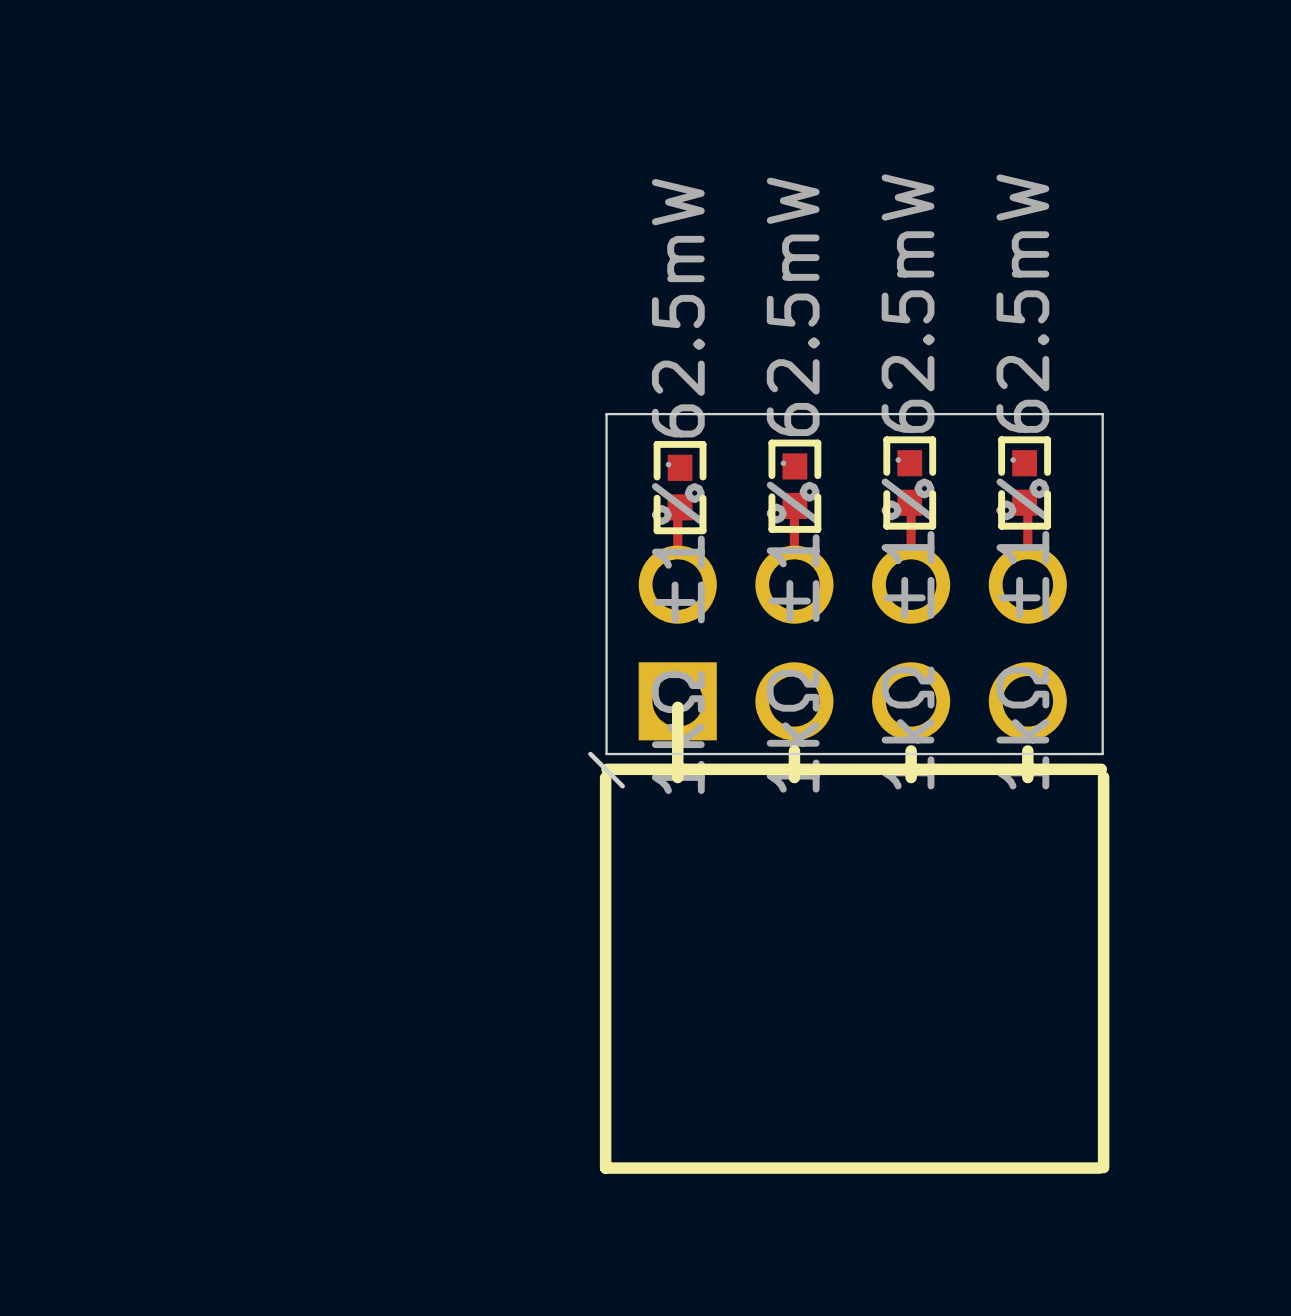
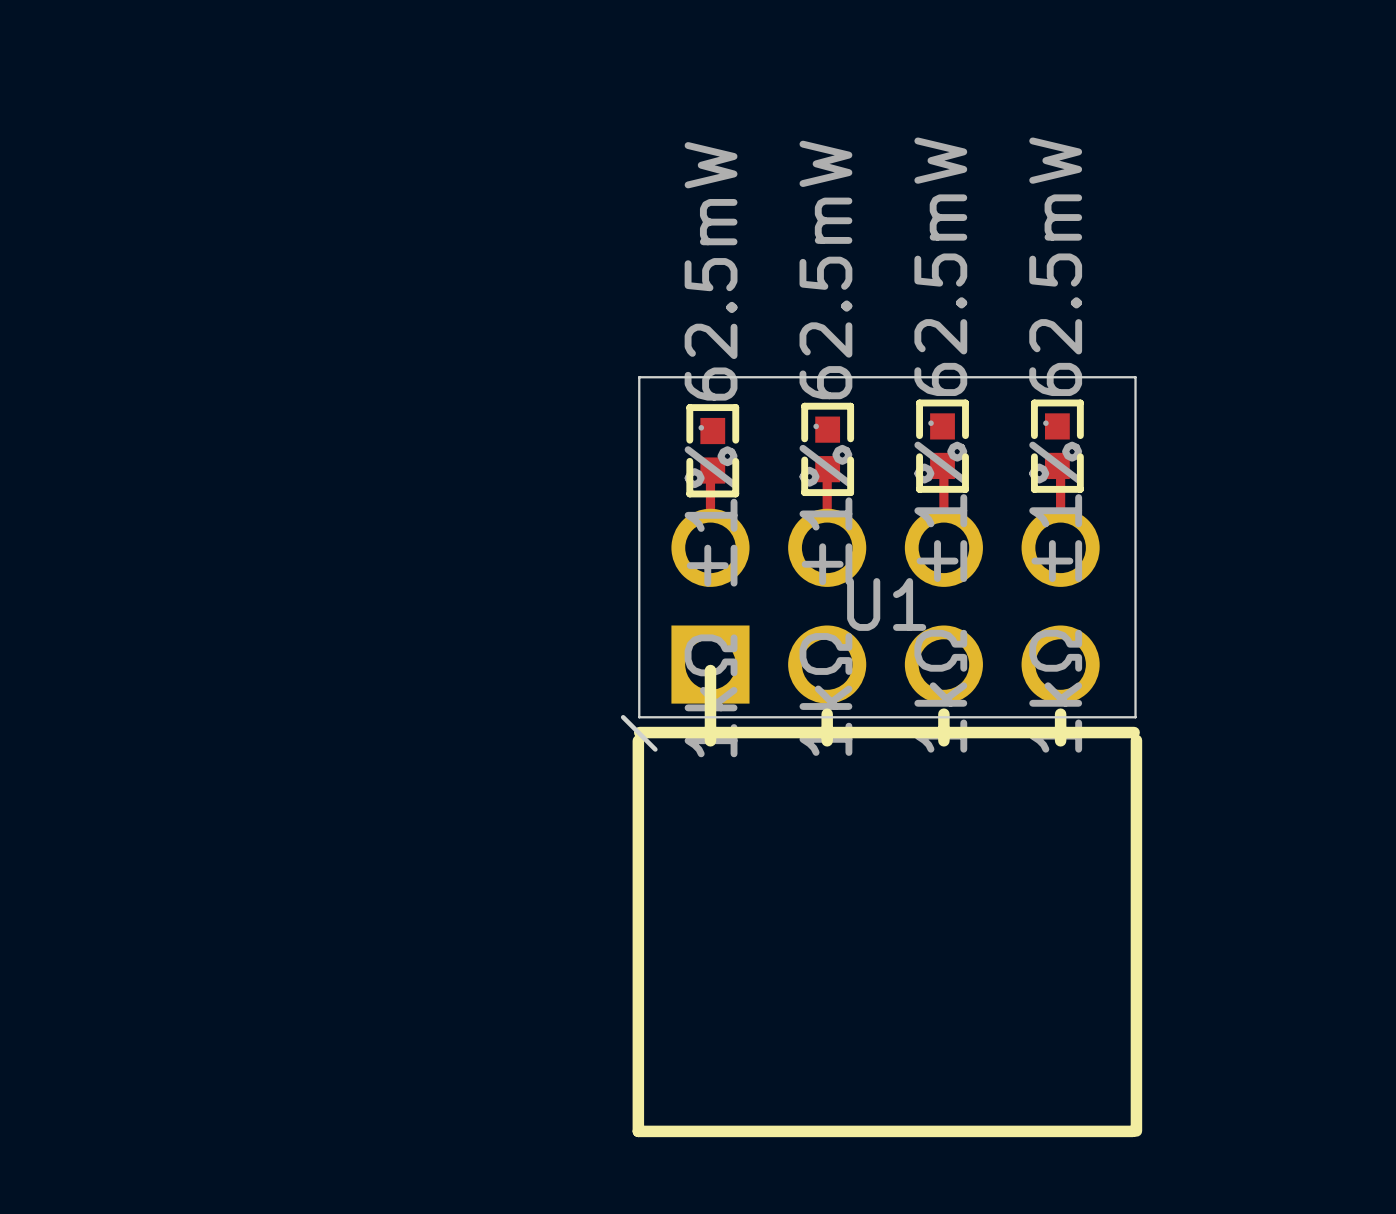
U1 name: none -> U1 (886, 604)

